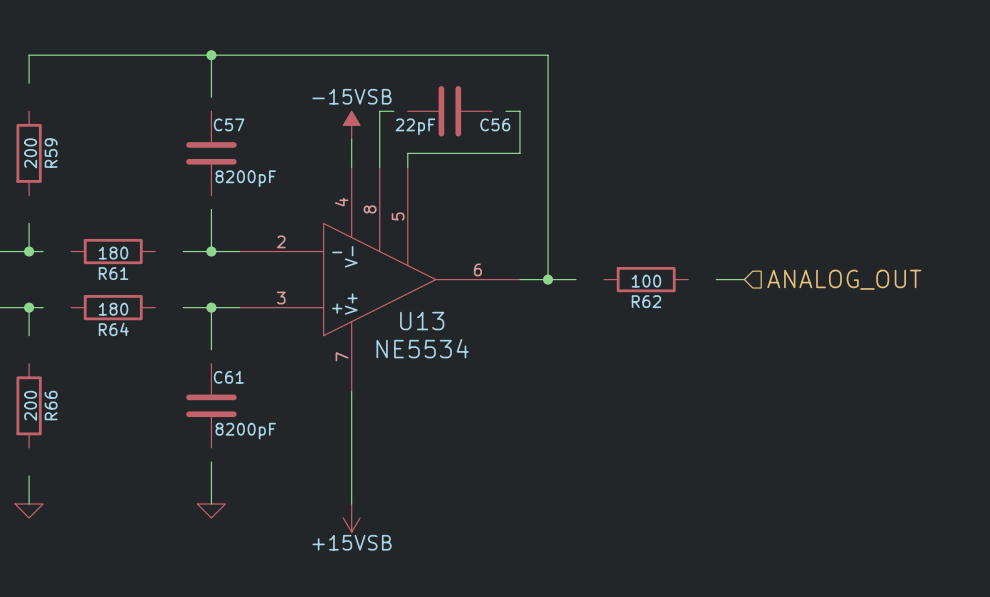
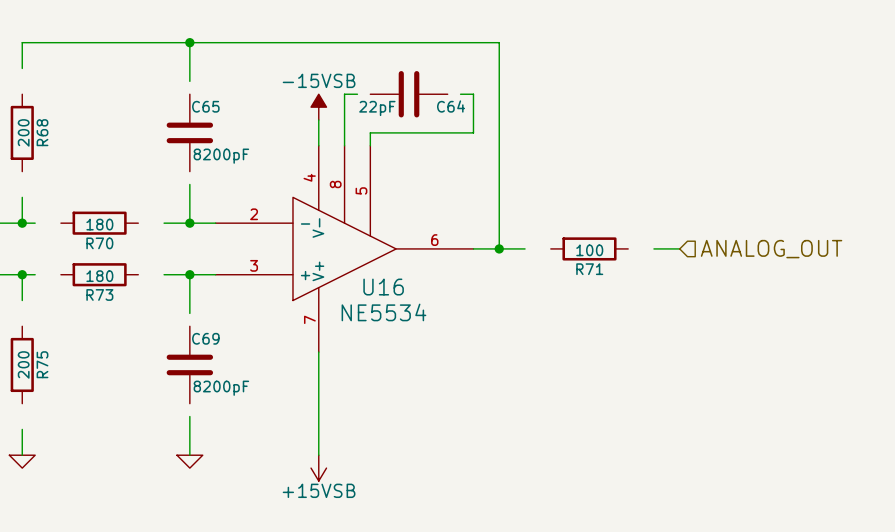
C57 name: C57 (229, 124) -> C65 (205, 106)
C56 name: C56 (495, 124) -> C64 (451, 106)
R59 name: R59 (51, 153) -> R68 (42, 132)
R61 name: R61 (113, 273) -> R70 (99, 243)
R62 name: R62 (646, 301) -> R71 (589, 269)
U13 name: U13 (422, 321) -> U16 (383, 287)
R64 name: R64 (113, 329) -> R73 (99, 294)
C61 name: C61 (228, 377) -> C69 (205, 338)
R66 name: R66 (51, 405) -> R75 (42, 364)

